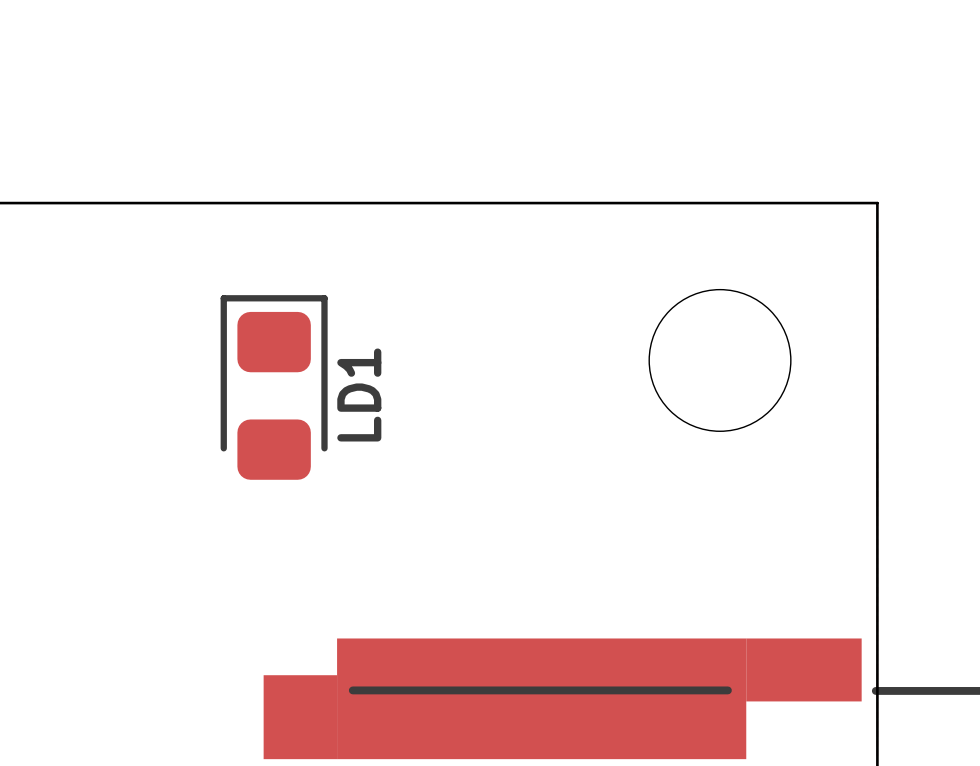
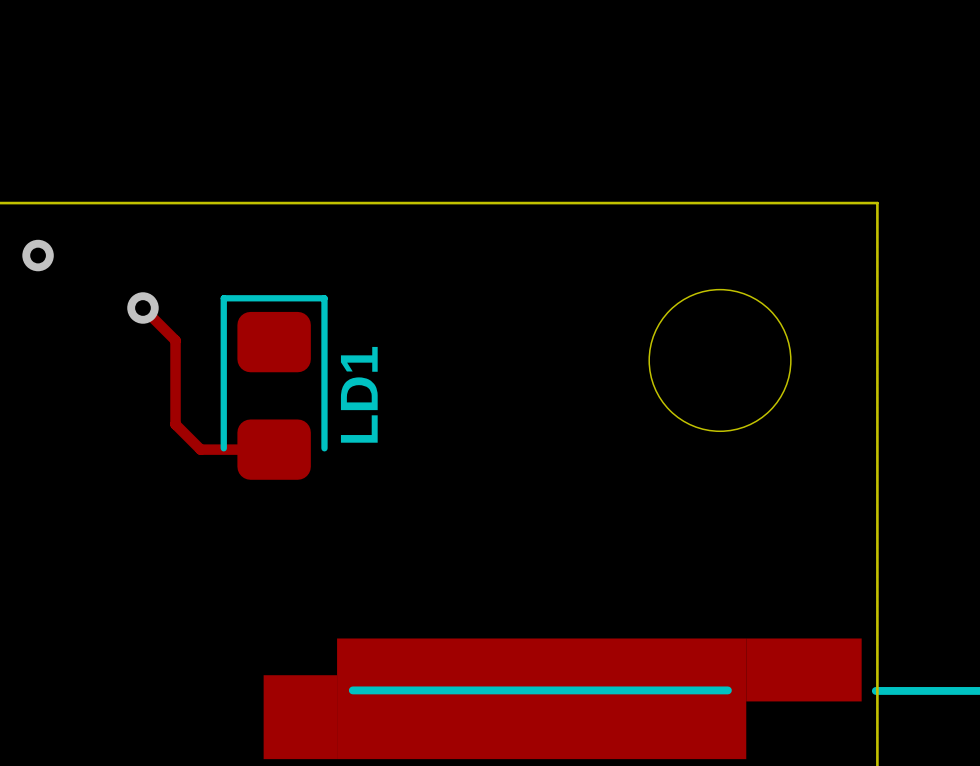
via: none -> (38, 255)
track: none -> (142, 307) (175, 340) (175, 424) (200, 449) (274, 449)
via: none -> (142, 307)

